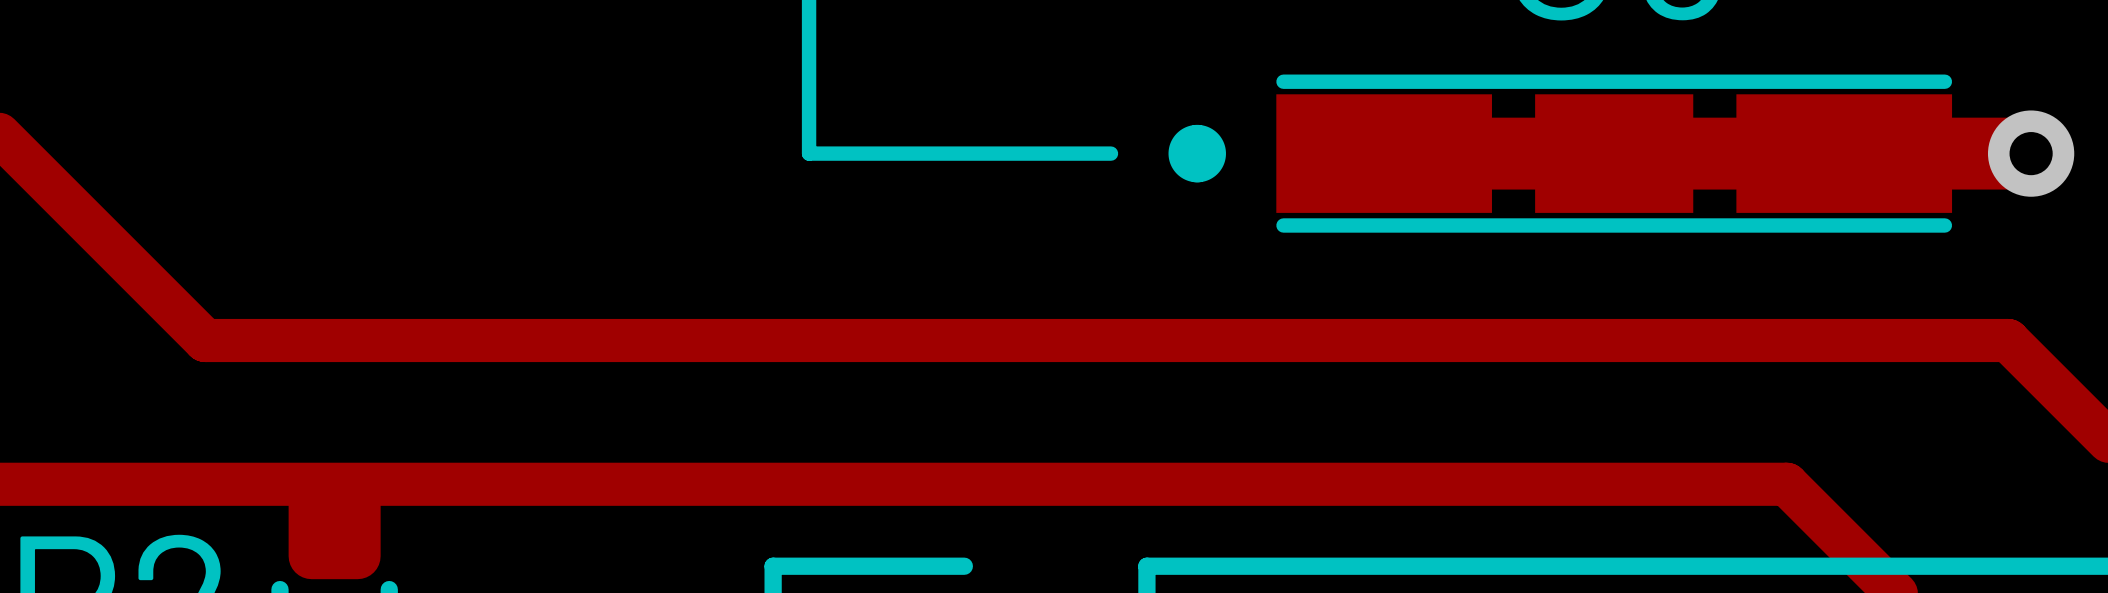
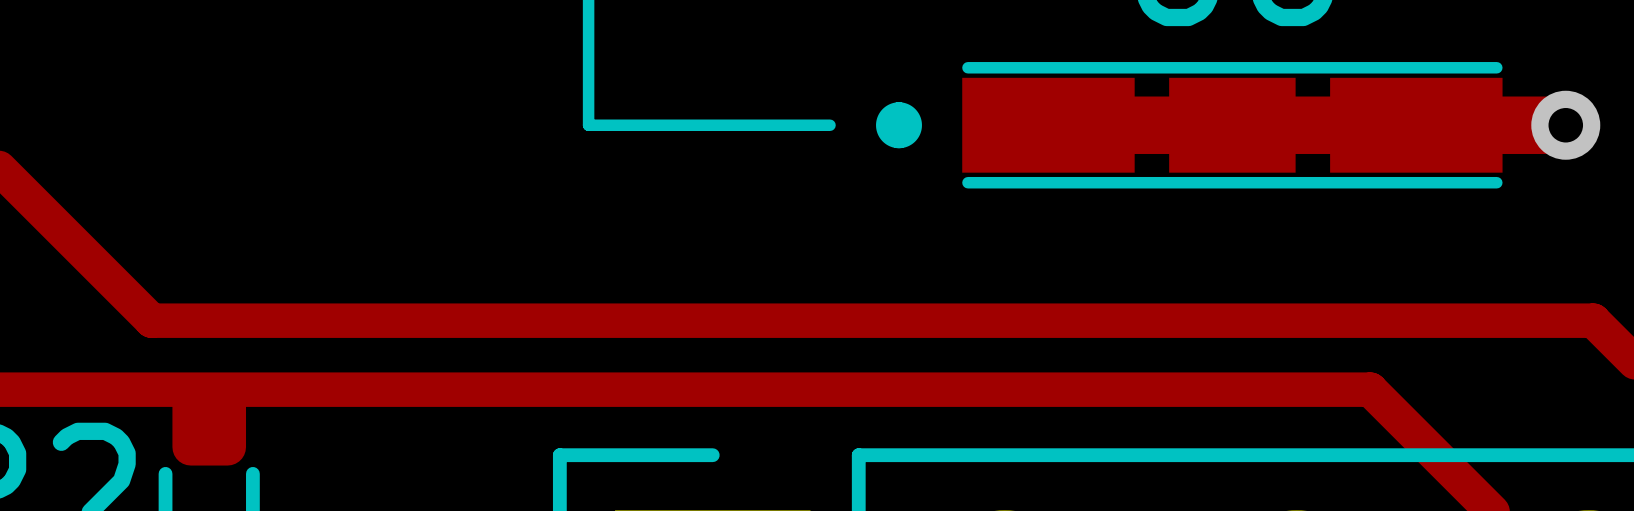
track: (205, 340) (2008, 340) (2065, 398) -> (105, 274) (151, 320) (1593, 320)

